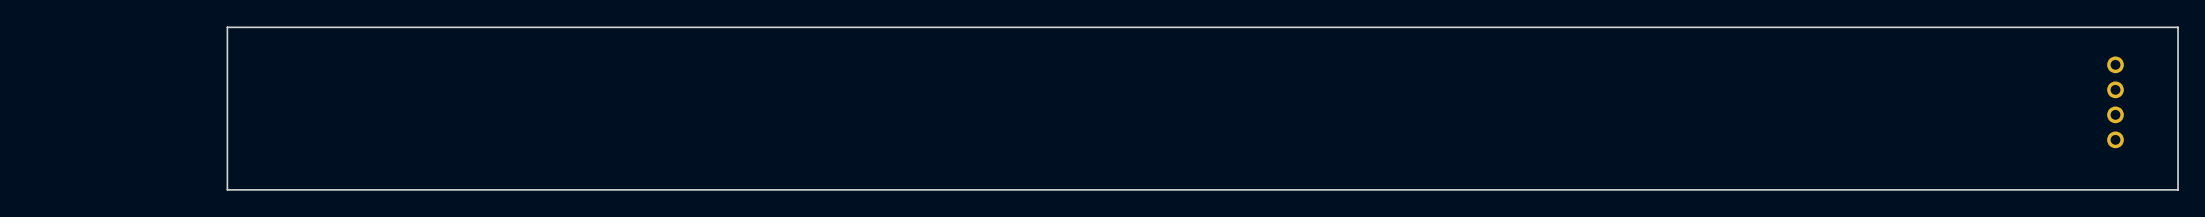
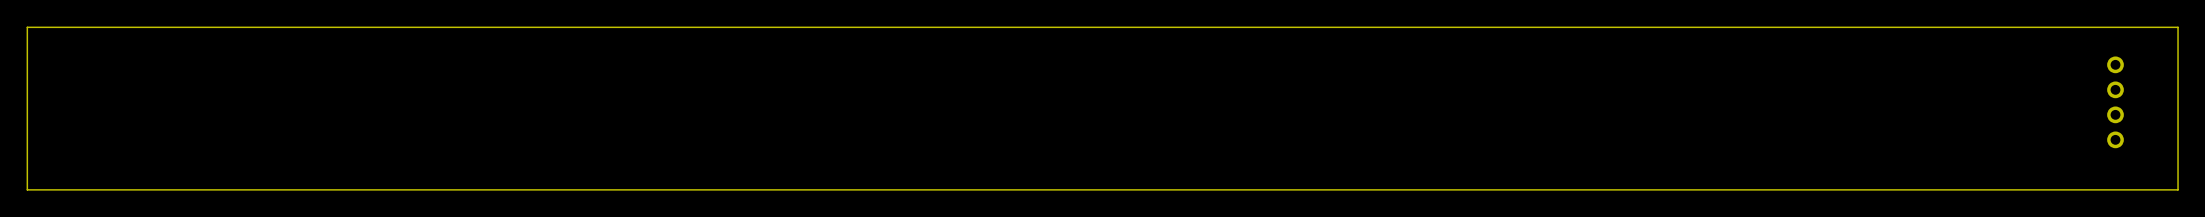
board edge: (227, 27) (227, 189) -> (227, 27) (27, 27) (27, 189) (227, 189)

